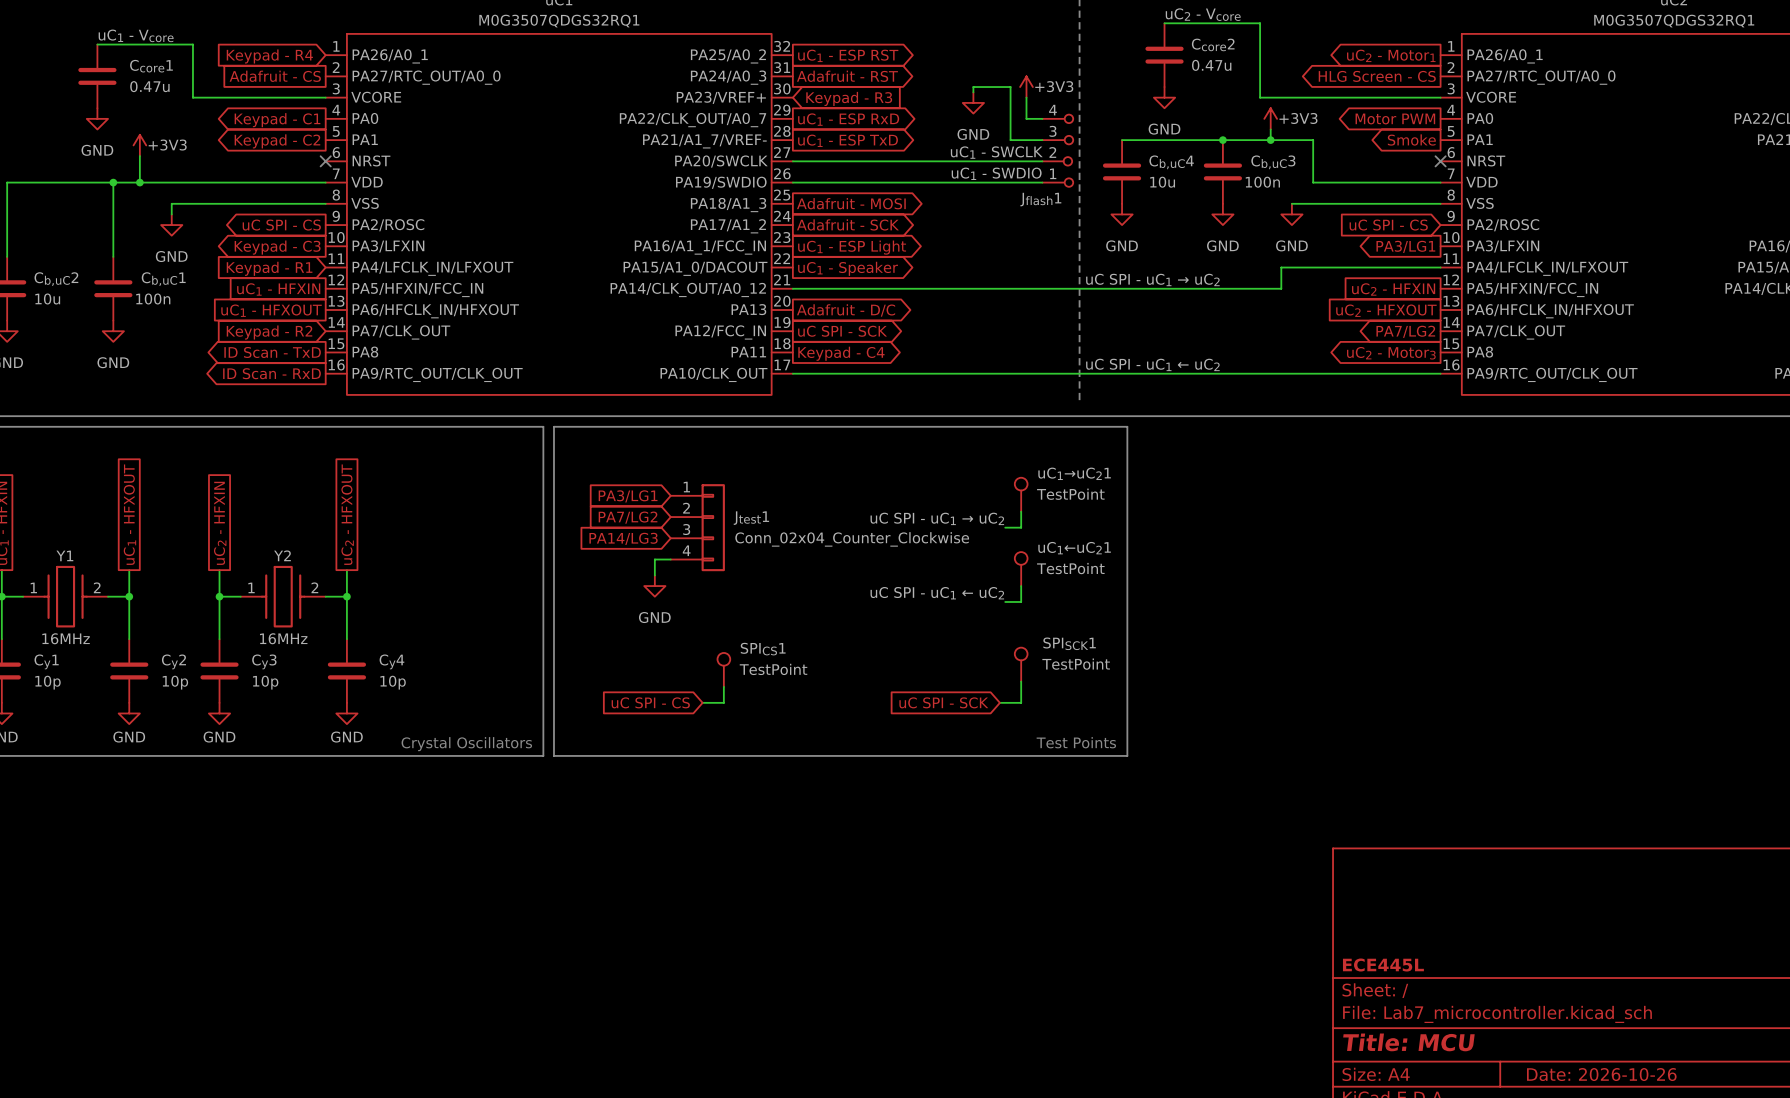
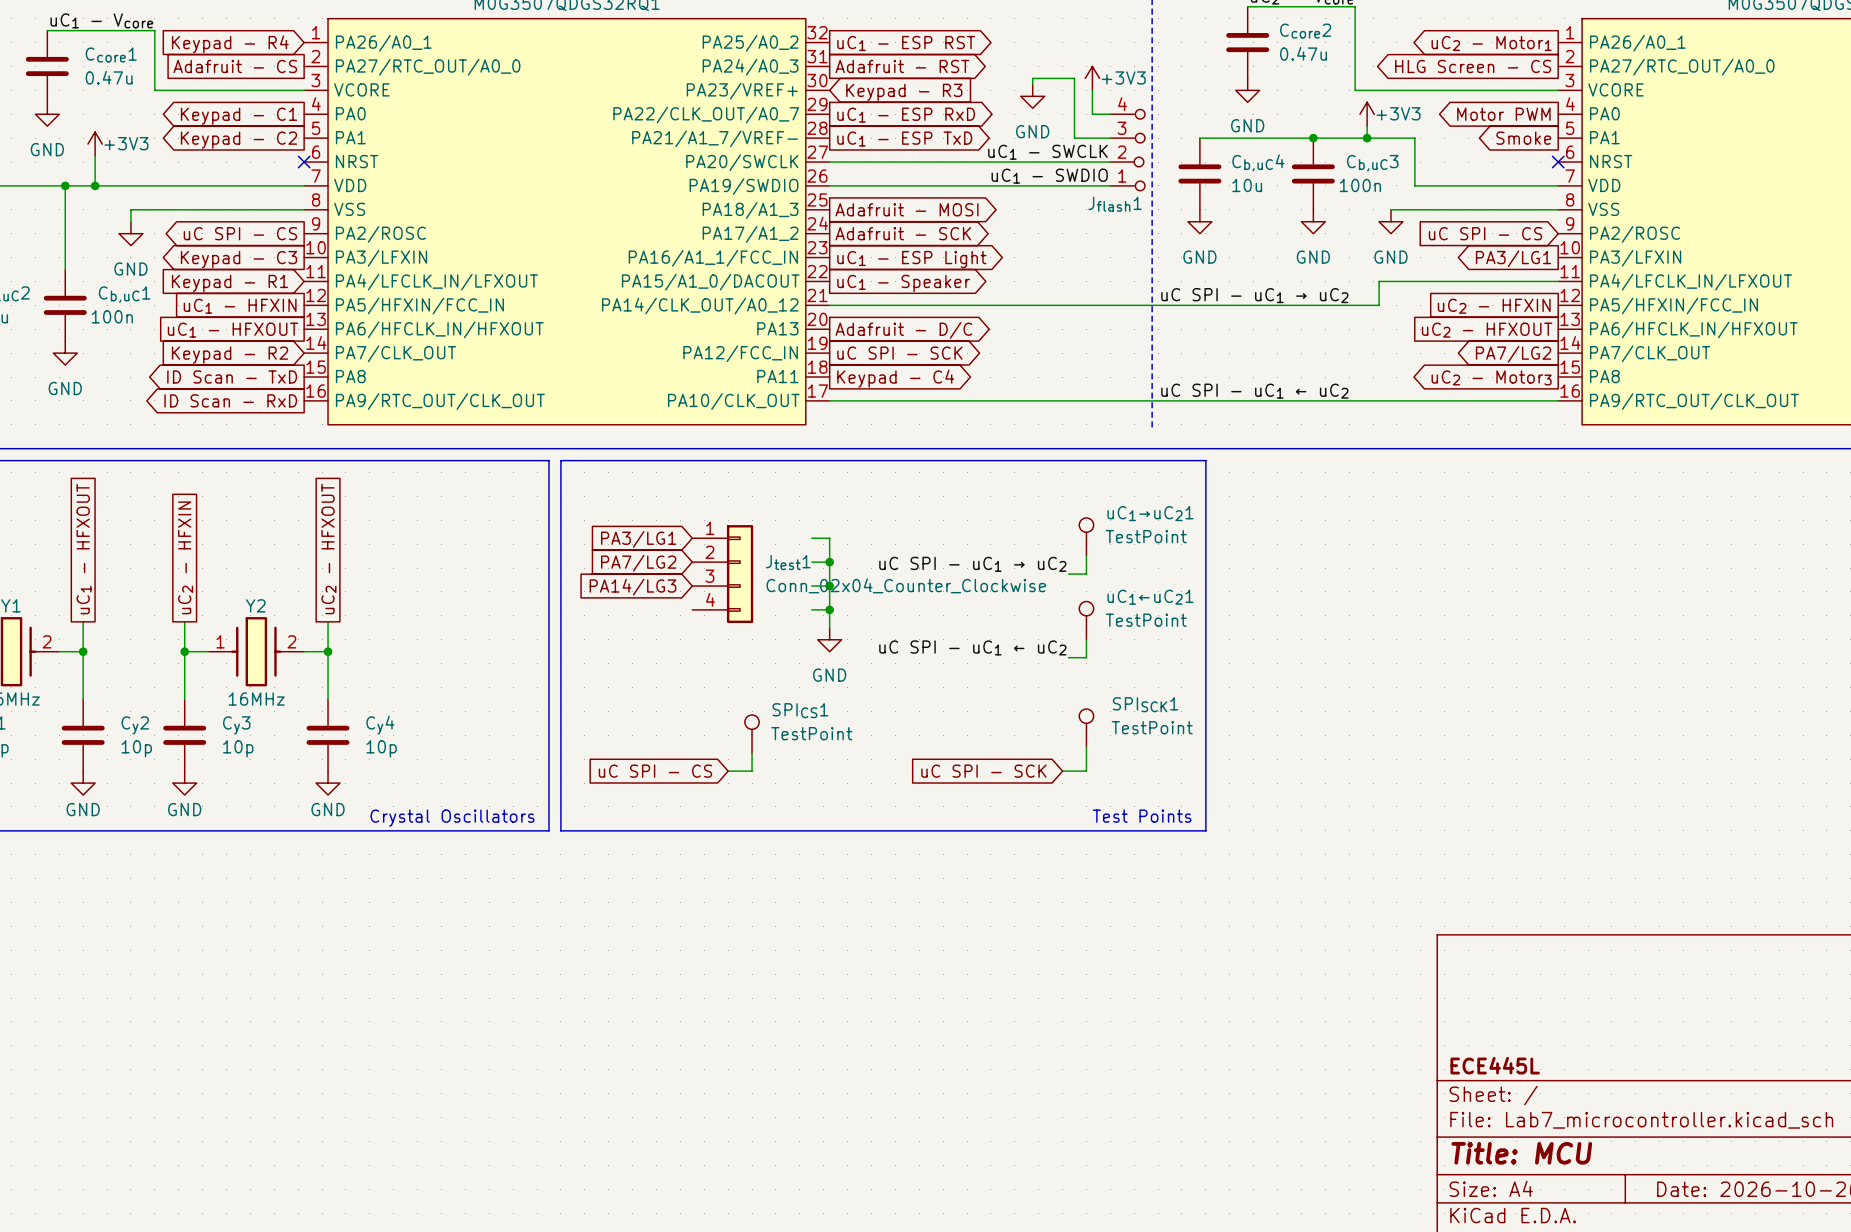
wire: none -> (811, 538) (829, 538) (829, 627)
wire: none -> (811, 562) (829, 562)
junction: none -> (829, 562)
wire: none -> (811, 586) (829, 586)
junction: none -> (829, 586)
wire: (670, 559) (654, 559) (654, 575) -> none
wire: none -> (811, 609) (829, 609)
junction: none -> (829, 609)
power symbol position: GND (654, 586) -> GND (829, 639)

